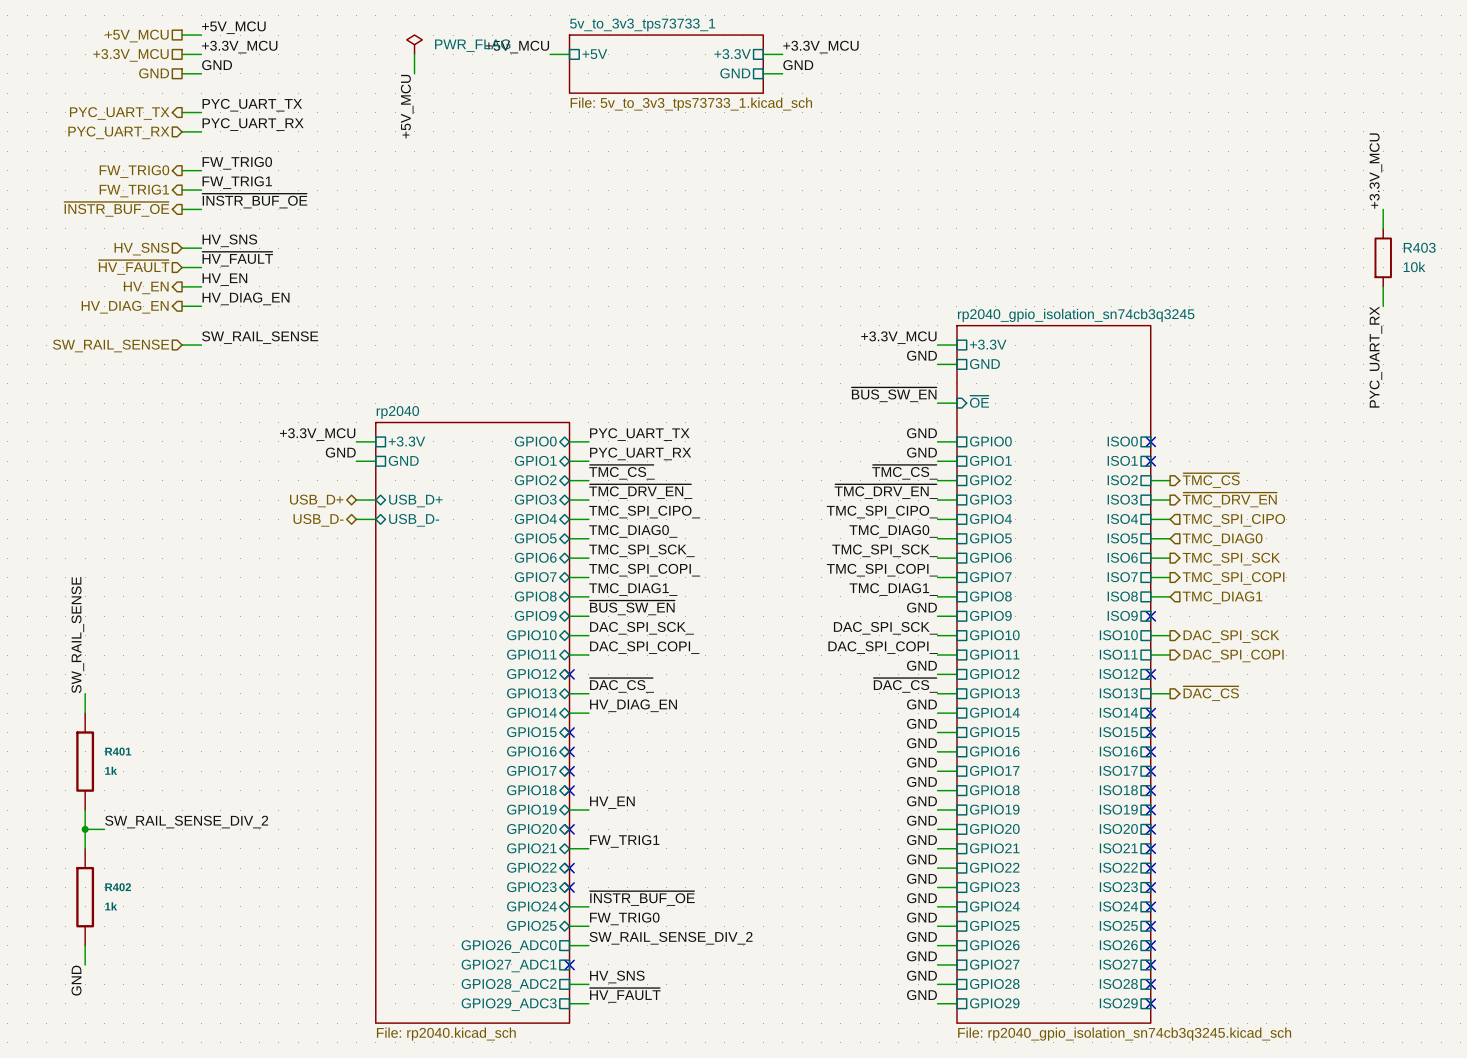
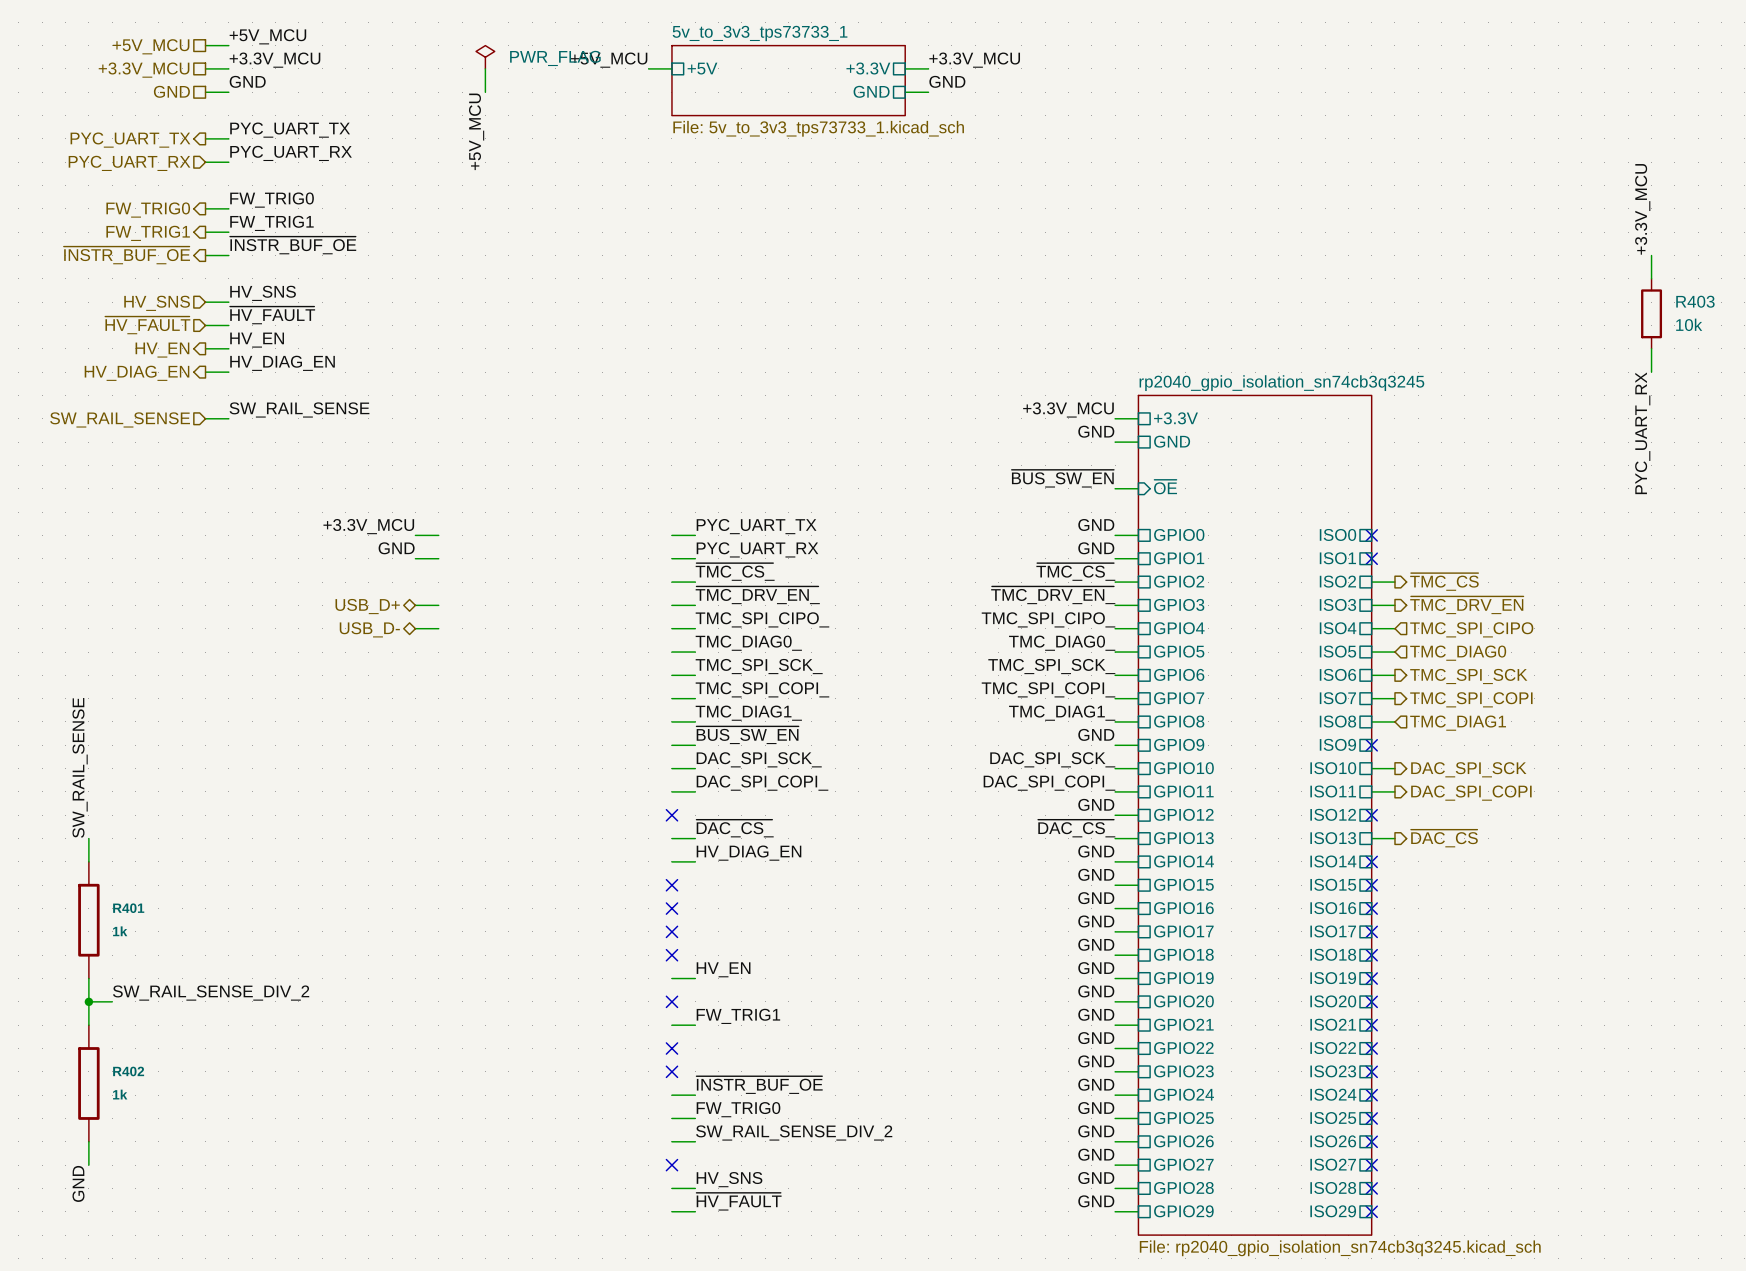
sheet pin: +3.3V (406, 441) -> none
sheet pin: GPIO0 (535, 441) -> none
sheet pin: GND (403, 460) -> none
sheet pin: GPIO1 (535, 460) -> none
sheet pin: GPIO2 (535, 480) -> none
sheet pin: GPIO3 (535, 499) -> none
sheet pin: USB_D+ (415, 500) -> none
sheet pin: GPIO4 (535, 519) -> none
sheet pin: USB_D- (414, 520) -> none
sheet pin: GPIO5 (535, 538) -> none
sheet pin: GPIO6 (535, 557) -> none
sheet pin: GPIO7 (535, 577) -> none
sheet pin: GPIO8 (535, 596) -> none
sheet pin: GPIO9 (535, 615) -> none
sheet pin: GPIO10 (531, 635) -> none
sheet pin: GPIO11 (531, 654) -> none
sheet pin: GPIO12 (531, 674) -> none
sheet pin: GPIO13 (531, 693) -> none
sheet pin: GPIO14 (531, 712) -> none
sheet rp2040: File: rp2040.kicad_sch (472, 722) -> none
sheet pin: GPIO15 (531, 732) -> none
sheet pin: GPIO16 (531, 751) -> none
sheet pin: GPIO17 (531, 770) -> none
sheet pin: GPIO18 (531, 790) -> none
sheet pin: GPIO19 (531, 809) -> none
sheet pin: GPIO20 (531, 829) -> none
sheet pin: GPIO21 (531, 848) -> none
sheet pin: GPIO22 (531, 867) -> none
sheet pin: GPIO23 (531, 887) -> none
sheet pin: GPIO24 (531, 906) -> none
sheet pin: GPIO25 (531, 925) -> none
sheet pin: GPIO26_ADC0 (509, 946) -> none
sheet pin: GPIO27_ADC1 (509, 965) -> none
sheet pin: GPIO28_ADC2 (509, 985) -> none
sheet pin: GPIO29_ADC3 (509, 1004) -> none

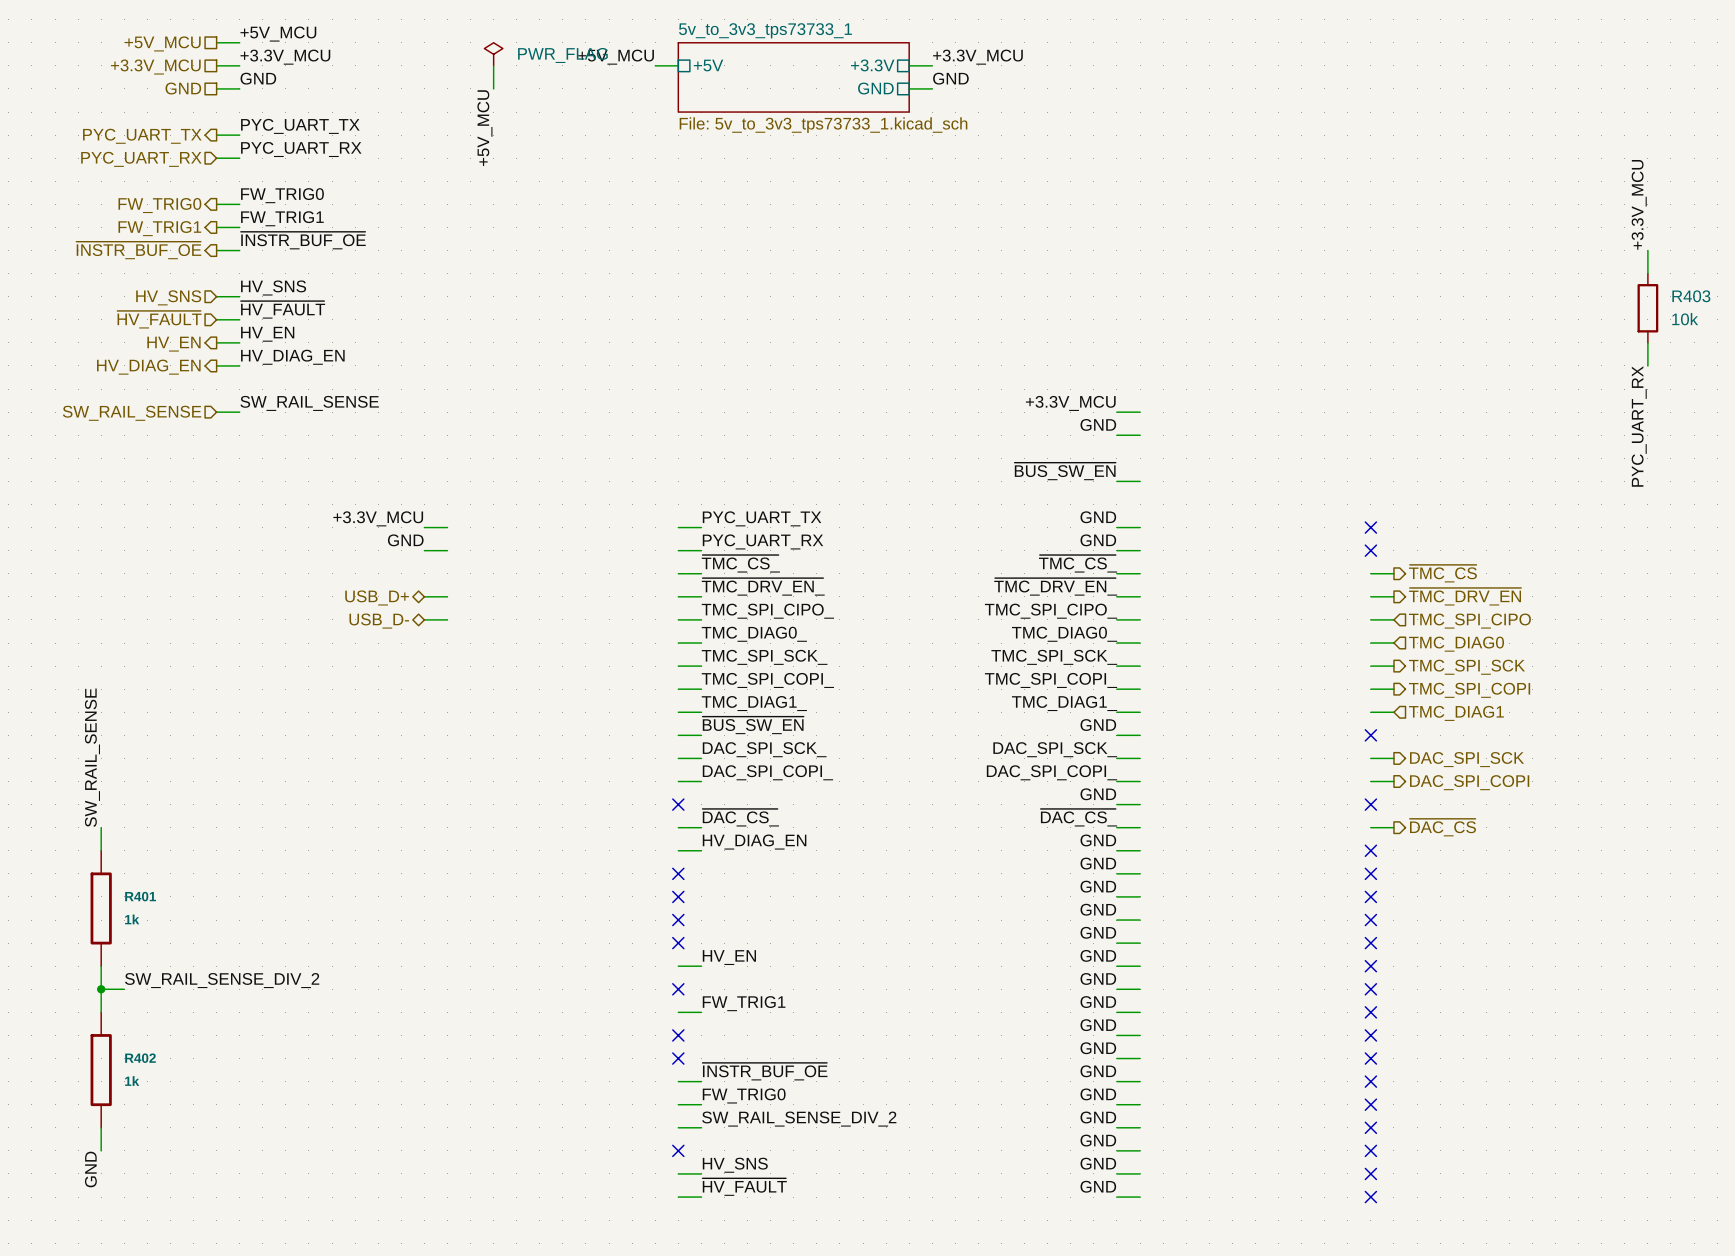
sheet pin: +3.3V (1176, 418) -> none
sheet pin: GND (1172, 441) -> none
sheet pin: ~{OE} (1165, 487) -> none
sheet pin: GPIO0 (1179, 534) -> none
sheet pin: ISO0 (1337, 534) -> none
sheet pin: GPIO1 (1179, 558) -> none
sheet pin: ISO1 (1337, 558) -> none
sheet pin: GPIO2 (1179, 581) -> none
sheet pin: ISO2 (1337, 581) -> none
sheet pin: GPIO3 (1179, 604) -> none
sheet pin: ISO3 (1337, 604) -> none
sheet pin: GPIO4 (1179, 628) -> none
sheet pin: ISO4 (1338, 628) -> none
sheet pin: GPIO5 (1179, 651) -> none
sheet pin: ISO5 (1337, 651) -> none
sheet pin: GPIO6 (1179, 674) -> none
sheet pin: ISO6 (1337, 674) -> none
sheet pin: GPIO7 (1179, 698) -> none
sheet pin: ISO7 (1337, 698) -> none
sheet pin: GPIO8 (1179, 721) -> none
sheet pin: ISO8 (1337, 721) -> none
sheet pin: GPIO9 (1179, 744) -> none
sheet pin: ISO9 (1337, 744) -> none
sheet pin: GPIO10 (1183, 768) -> none
sheet pin: ISO10 (1333, 768) -> none
sheet pin: GPIO11 (1183, 791) -> none
sheet pin: ISO11 (1333, 791) -> none
sheet pin: GPIO12 (1183, 814) -> none
sheet pin: ISO12 (1333, 814) -> none
sheet rp2040_gpio_isolation_sn74cb3q3245: File: rp2040_gpio_isolation_sn74cb3q3245.kicad_sch (1255, 815) -> none
sheet pin: GPIO13 (1183, 838) -> none
sheet pin: ISO13 (1333, 838) -> none
sheet pin: GPIO14 (1184, 861) -> none
sheet pin: ISO14 (1333, 861) -> none
sheet pin: GPIO15 (1183, 884) -> none
sheet pin: ISO15 (1333, 884) -> none
sheet pin: GPIO16 (1183, 908) -> none
sheet pin: ISO16 (1333, 908) -> none
sheet pin: GPIO17 (1183, 931) -> none
sheet pin: ISO17 (1333, 931) -> none
sheet pin: GPIO18 (1183, 954) -> none
sheet pin: ISO18 (1333, 954) -> none
sheet pin: GPIO19 (1183, 978) -> none
sheet pin: ISO19 (1333, 978) -> none
sheet pin: GPIO20 (1183, 1001) -> none
sheet pin: ISO20 (1333, 1001) -> none
sheet pin: GPIO21 (1183, 1024) -> none
sheet pin: ISO21 (1333, 1024) -> none
sheet pin: GPIO22 (1183, 1048) -> none
sheet pin: ISO22 (1333, 1048) -> none
sheet pin: GPIO23 (1183, 1071) -> none
sheet pin: ISO23 (1333, 1071) -> none
sheet pin: GPIO24 (1184, 1094) -> none
sheet pin: ISO24 (1333, 1094) -> none
sheet pin: GPIO25 (1183, 1118) -> none
sheet pin: ISO25 (1333, 1118) -> none
sheet pin: GPIO26 (1183, 1141) -> none
sheet pin: ISO26 (1333, 1141) -> none
sheet pin: GPIO27 (1183, 1164) -> none
sheet pin: ISO27 (1333, 1164) -> none
sheet pin: GPIO28 (1183, 1188) -> none
sheet pin: ISO28 (1333, 1188) -> none
sheet pin: GPIO29 (1183, 1211) -> none
sheet pin: ISO29 (1333, 1211) -> none

